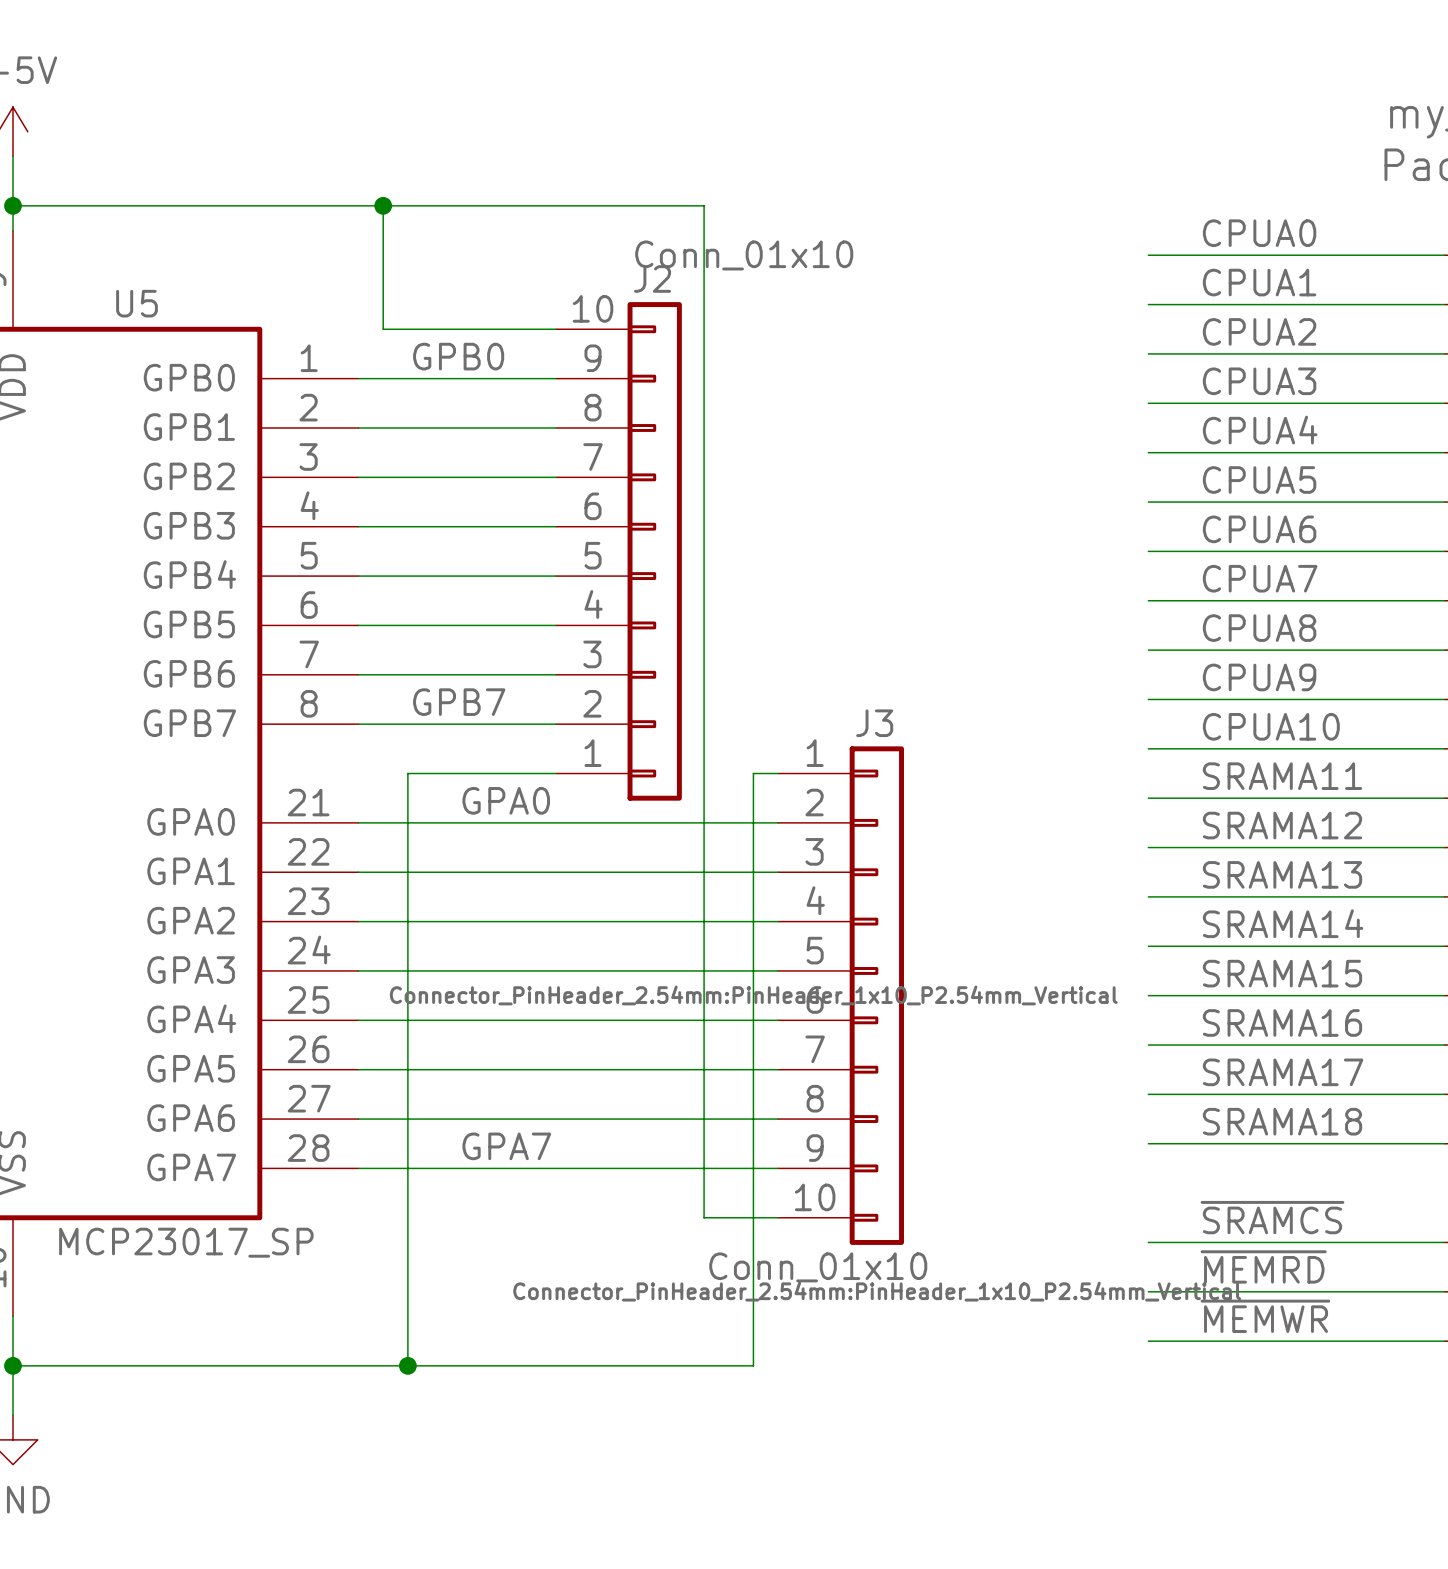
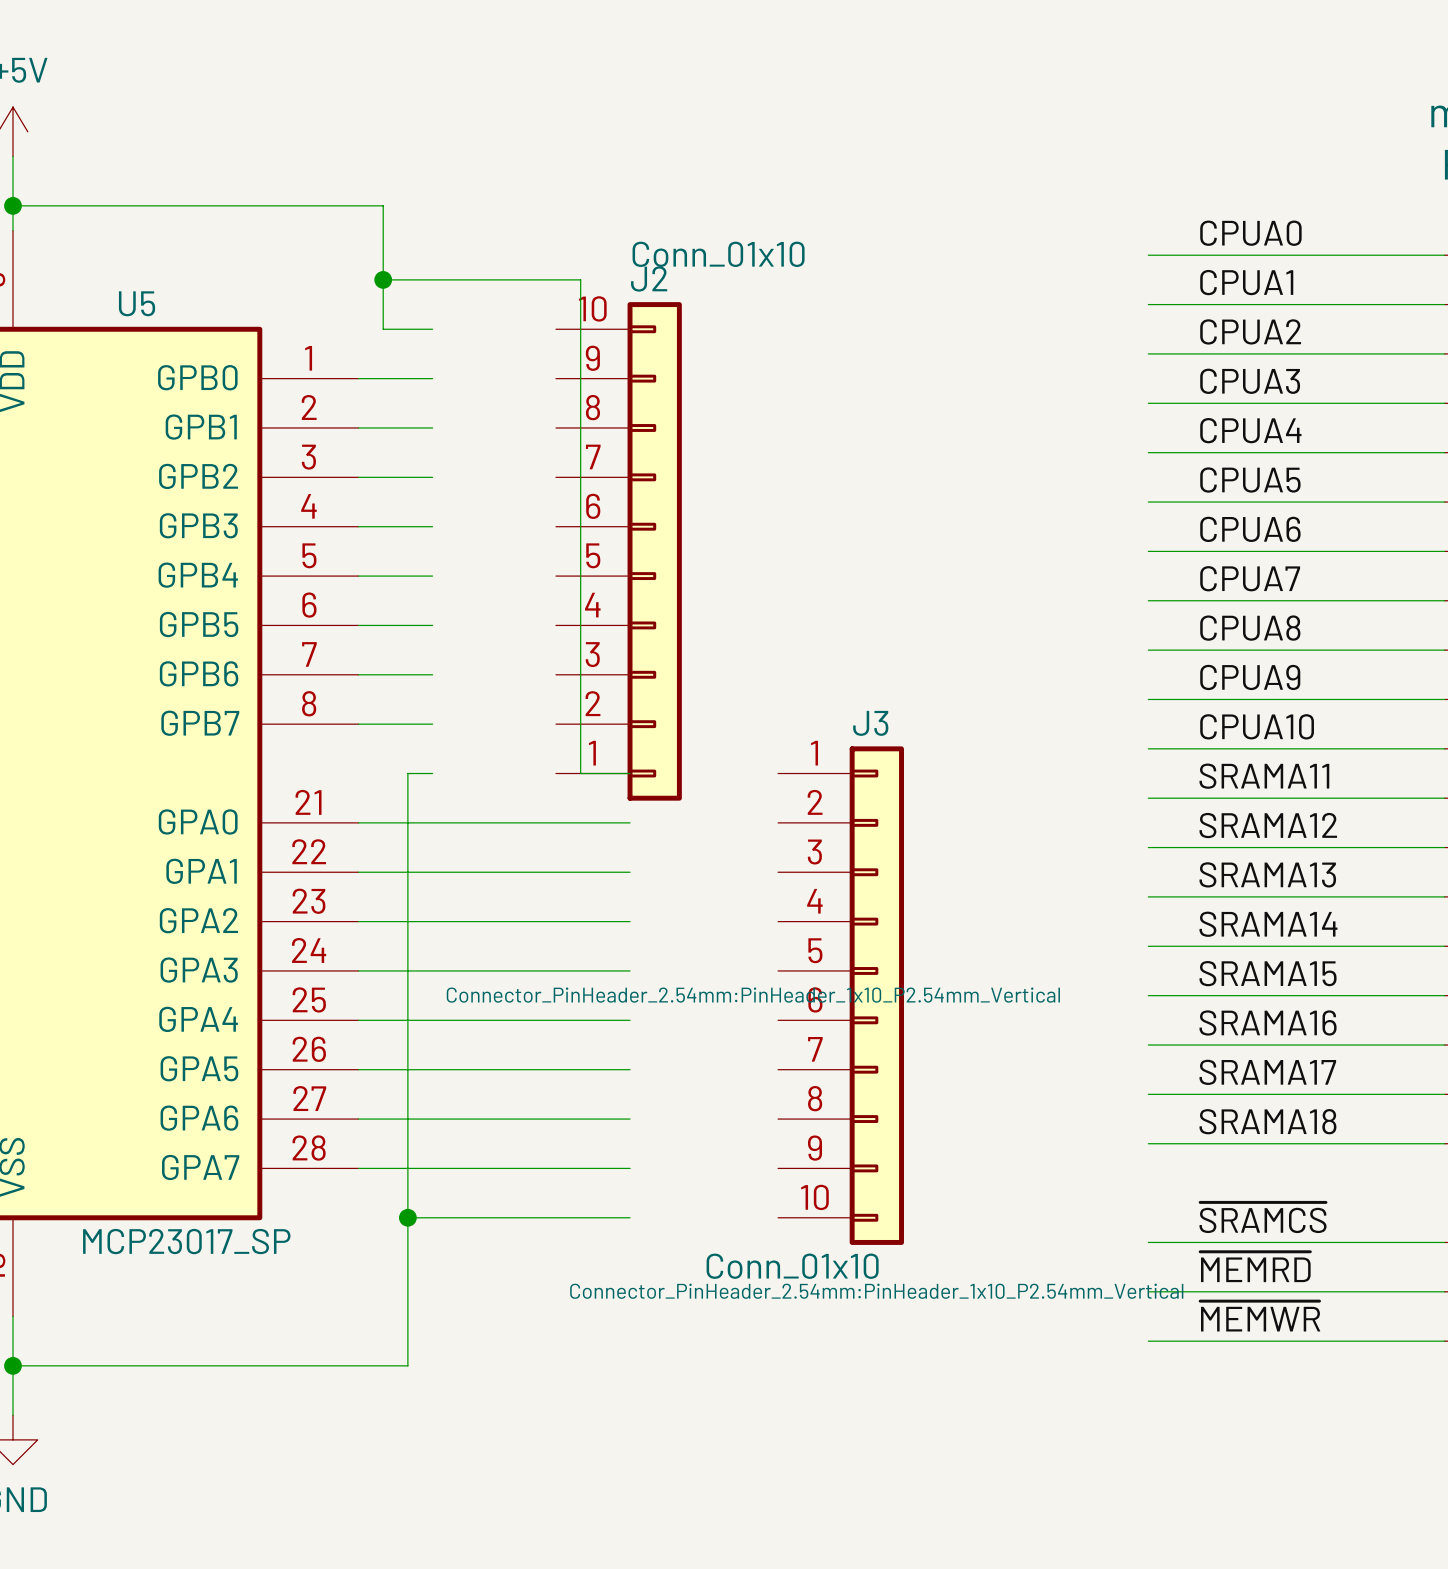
wire: (383, 205) (704, 205) (704, 1217) (778, 1217) -> none
junction position: (383, 205) -> (383, 279)
wire: none -> (383, 279) (580, 279) (580, 773) (630, 773)
wire: (432, 329) (555, 329) -> none
label: GPB0 (458, 356) -> none
wire: (432, 378) (555, 378) -> none
wire: (432, 427) (555, 427) -> none
wire: (432, 477) (555, 477) -> none
wire: (432, 526) (555, 526) -> none
wire: (432, 576) (555, 576) -> none
wire: (432, 625) (555, 625) -> none
wire: (432, 674) (555, 674) -> none
label: GPB7 (459, 702) -> none
wire: (432, 724) (555, 724) -> none
wire: (432, 773) (555, 773) -> none
wire: (778, 773) (753, 773) (753, 1365) (407, 1365) -> none
label: GPA0 (506, 800) -> none
wire: (630, 822) (778, 822) -> none
wire: (630, 872) (778, 872) -> none
wire: (630, 921) (778, 921) -> none
wire: (630, 970) (778, 970) -> none
wire: (630, 1020) (778, 1020) -> none
wire: (630, 1069) (778, 1069) -> none
wire: (630, 1119) (778, 1119) -> none
label: GPA7 (506, 1146) -> none
wire: (630, 1168) (778, 1168) -> none
wire: none -> (407, 1217) (630, 1217)
junction: none -> (407, 1217)
junction: (407, 1365) -> none

